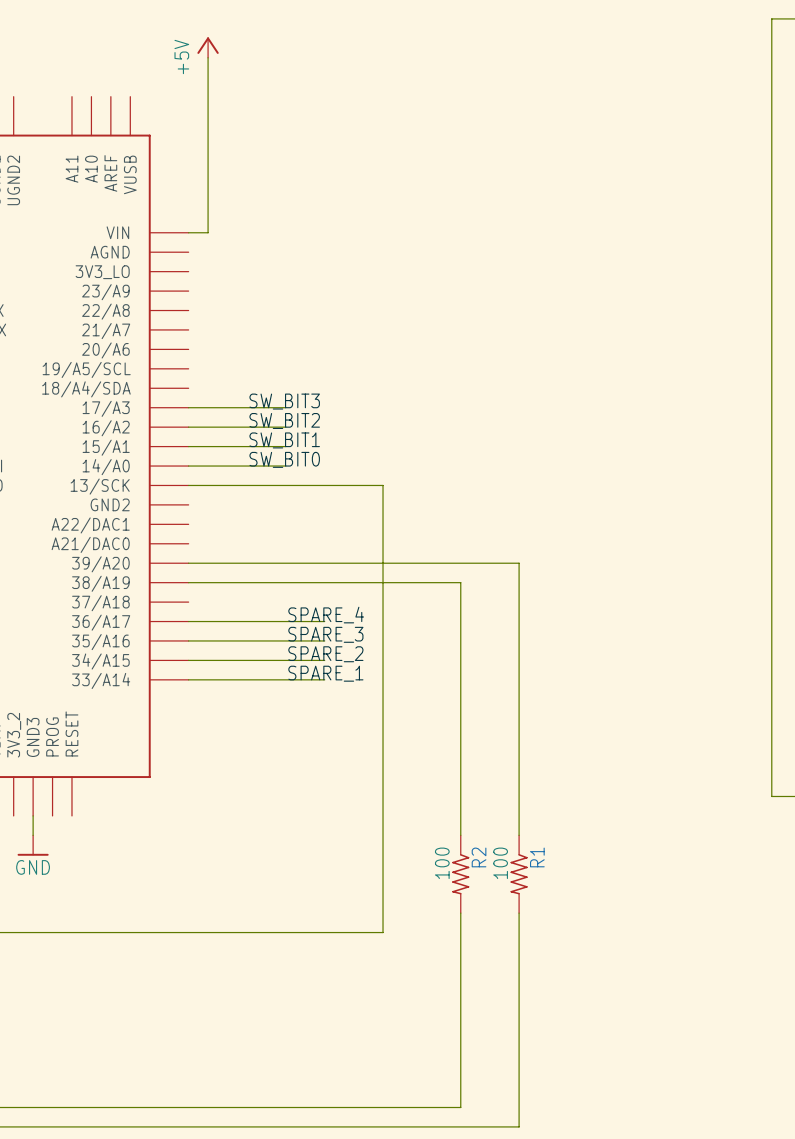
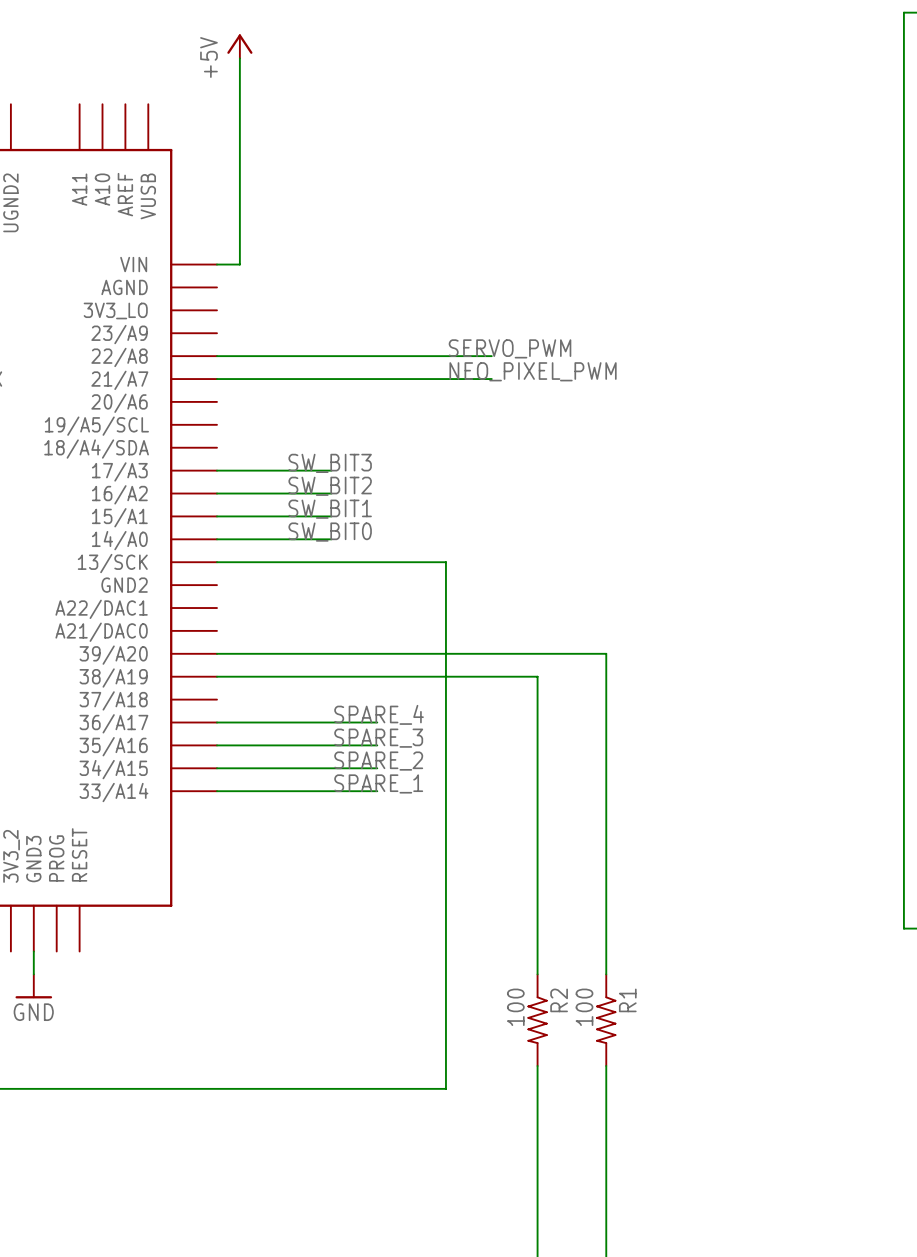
label: none -> SERVO_PWM (510, 348)
wire: none -> (216, 356) (491, 356)
label: none -> NEO_PIXEL_PWM (533, 371)
wire: none -> (216, 379) (491, 379)

